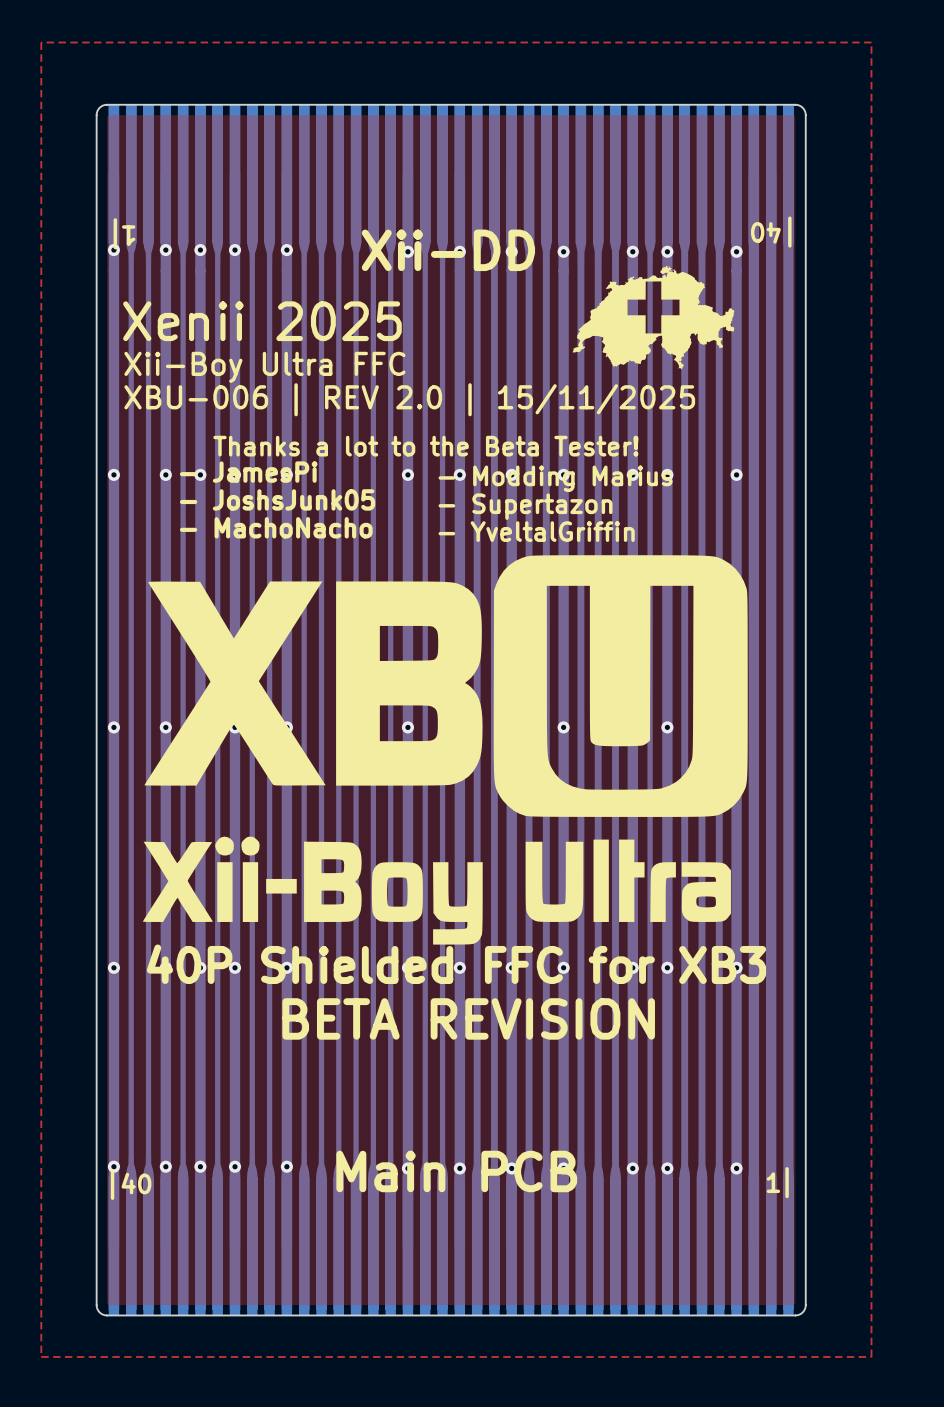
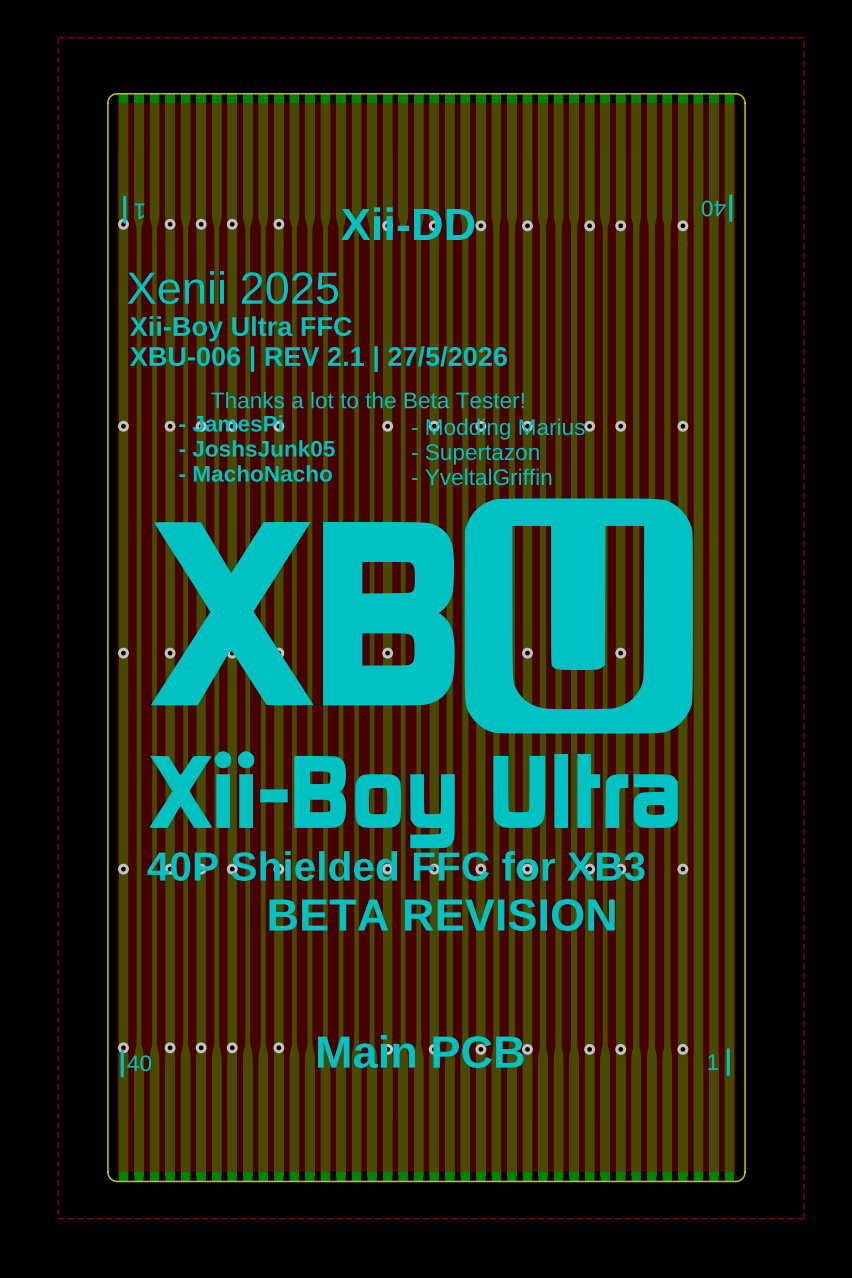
drawing: [572, 265, 735, 370] -> none
text: XBU-006 | REV 2.0 | 15/11/2025 (409, 399) -> XBU-006 | REV 2.1 | 27/5/2026 (318, 359)

